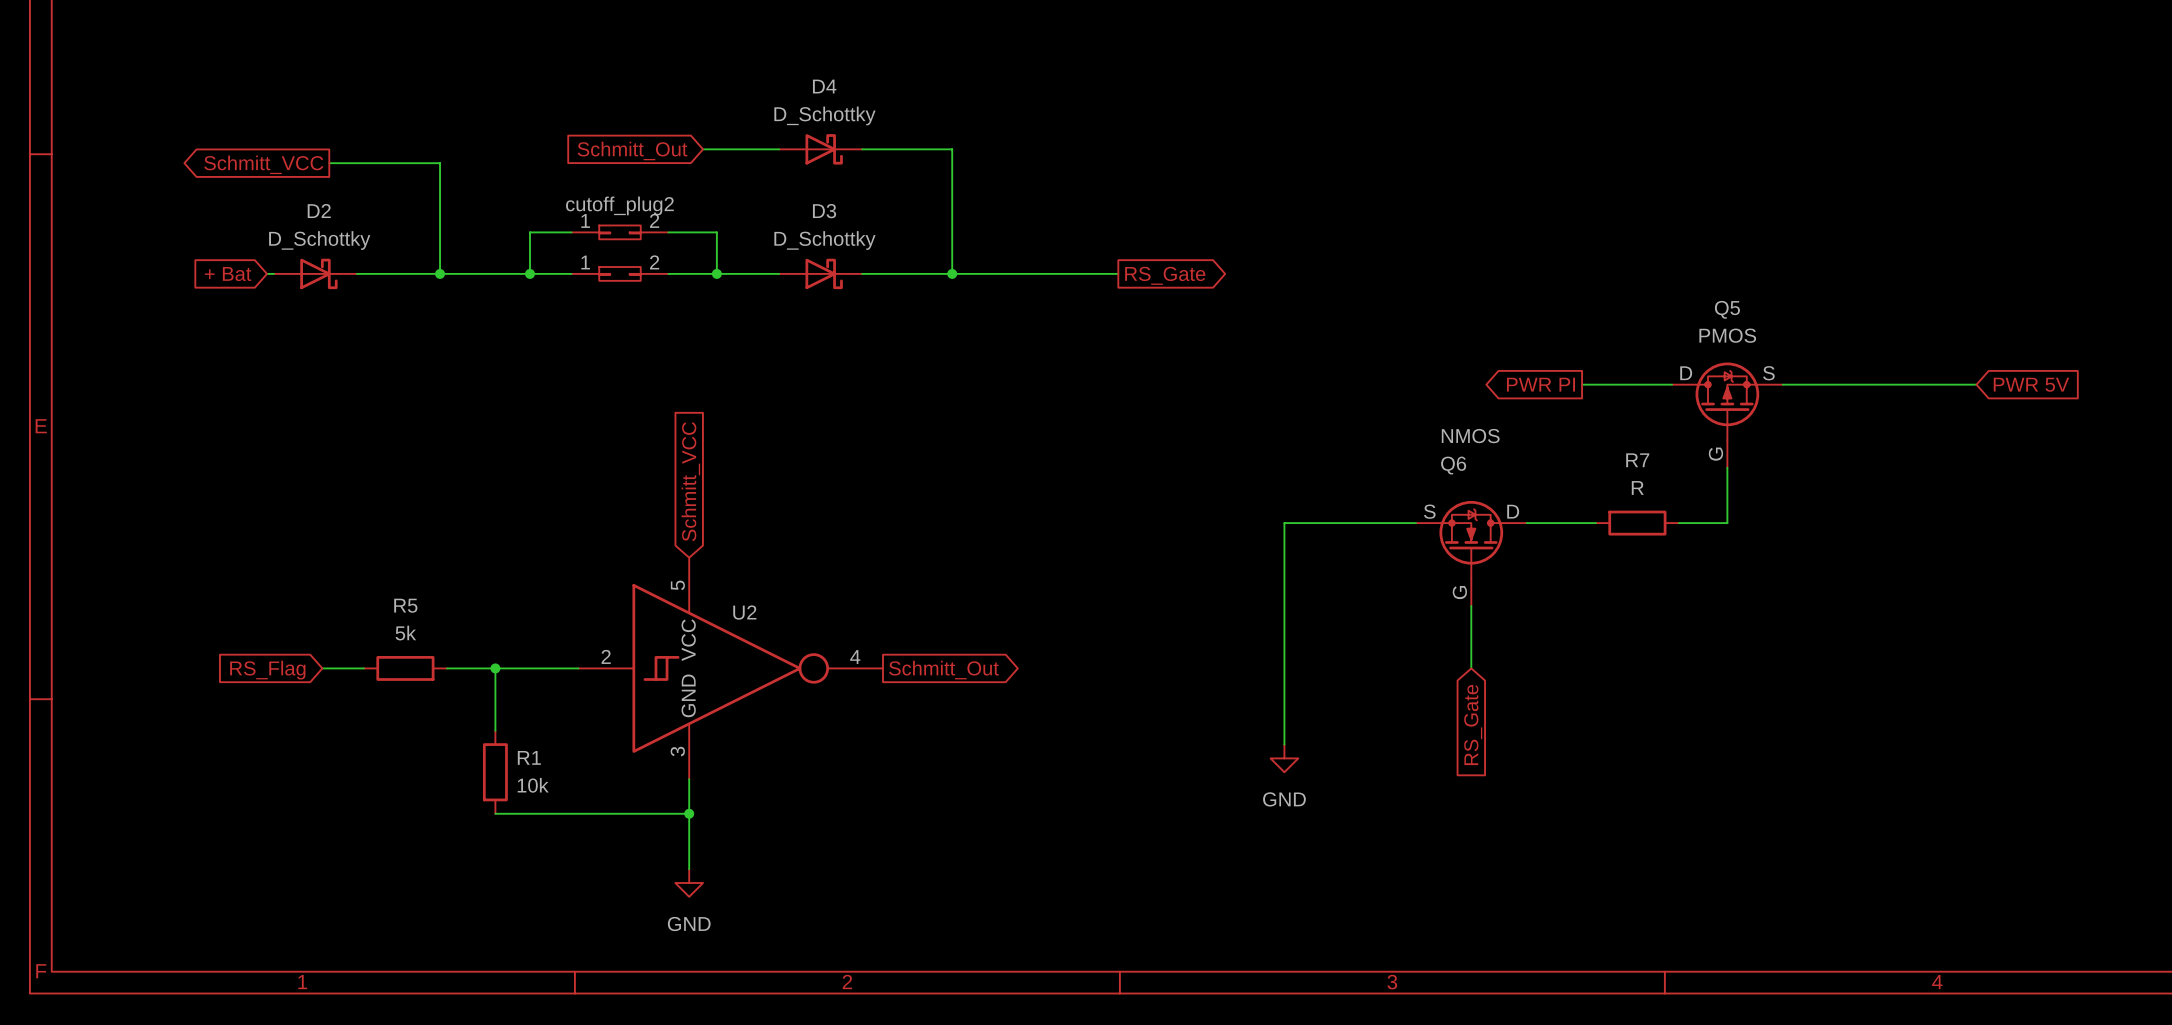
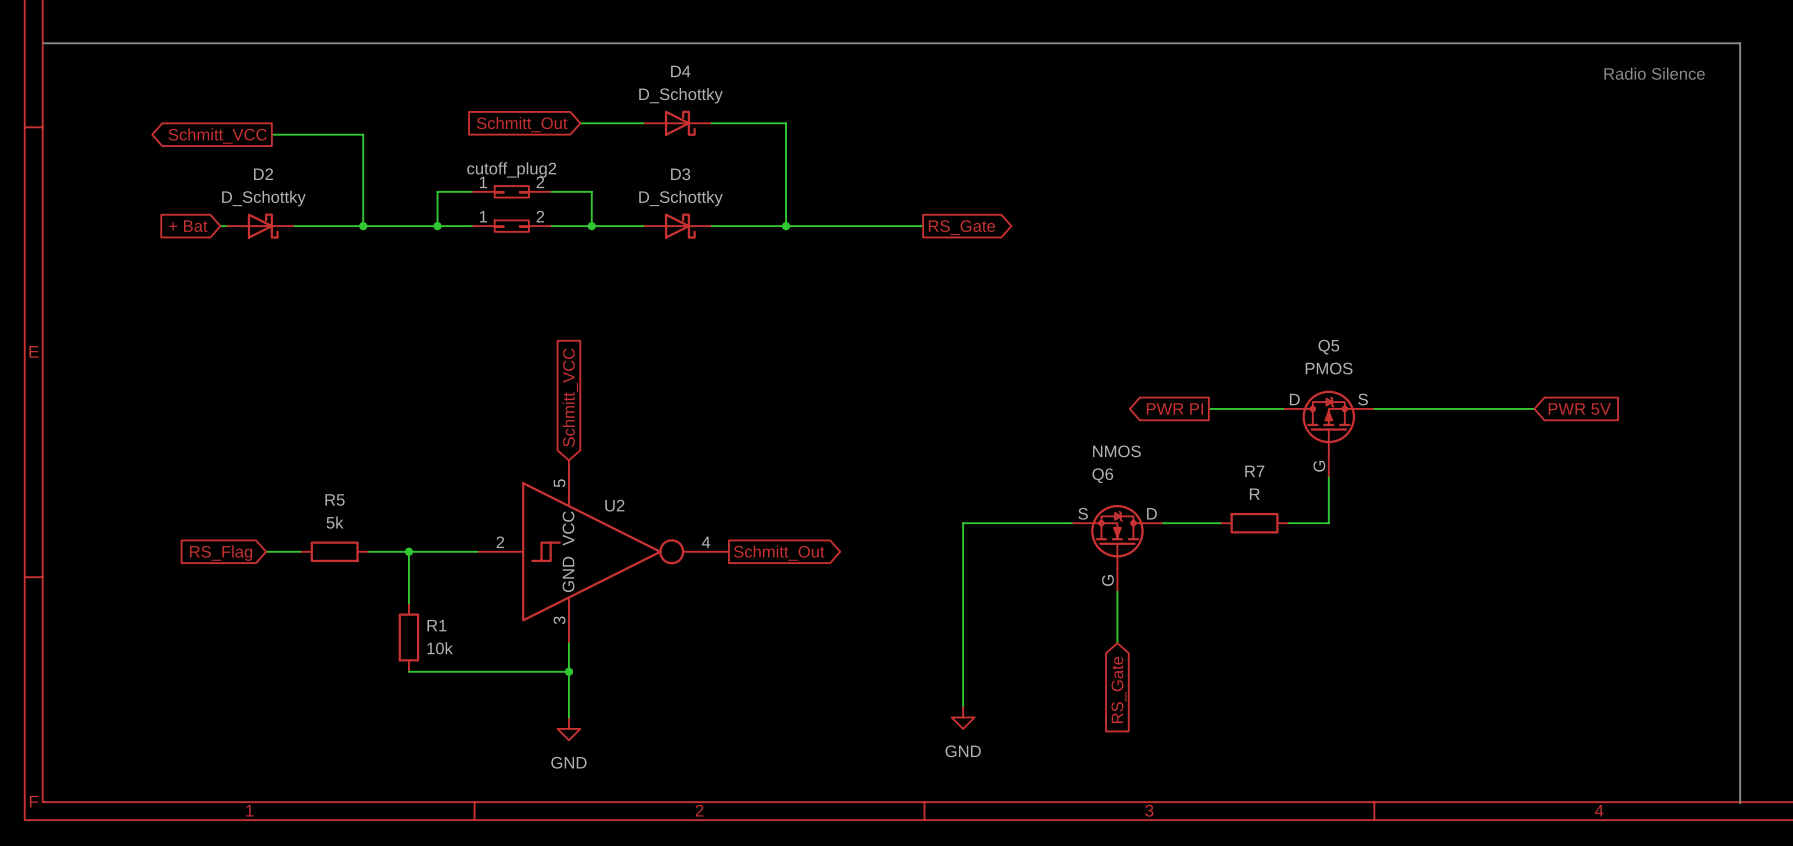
line: none -> (43, 43) (1740, 43) (1740, 803)
text: none -> Radio Silence (1654, 73)
global label position: PWR PI (1540, 384) -> PWR PI (1174, 408)
wire: (1582, 384) (1672, 384) -> (1208, 408) (1283, 408)
wire: (1782, 384) (1976, 384) -> (1374, 408) (1534, 408)
global label position: PWR 5V (2031, 384) -> PWR 5V (1579, 409)
Q5 position: (1727, 415) -> (1328, 434)
wire: (1727, 467) (1727, 523) (1678, 523) -> (1328, 477) (1328, 523) (1288, 523)
wire: (1415, 523) (1284, 523) (1284, 744) -> (1071, 523) (963, 523) (963, 706)
wire: (1526, 523) (1595, 523) -> (1163, 523) (1220, 523)
R7 position: (1637, 523) -> (1254, 523)
Q6 position: (1471, 553) -> (1117, 548)
wire: (1471, 606) (1471, 668) -> (1117, 591) (1117, 643)
global label position: RS_Gate (1473, 725) -> RS_Gate (1118, 689)
power symbol position: GND (1284, 758) -> GND (963, 717)

